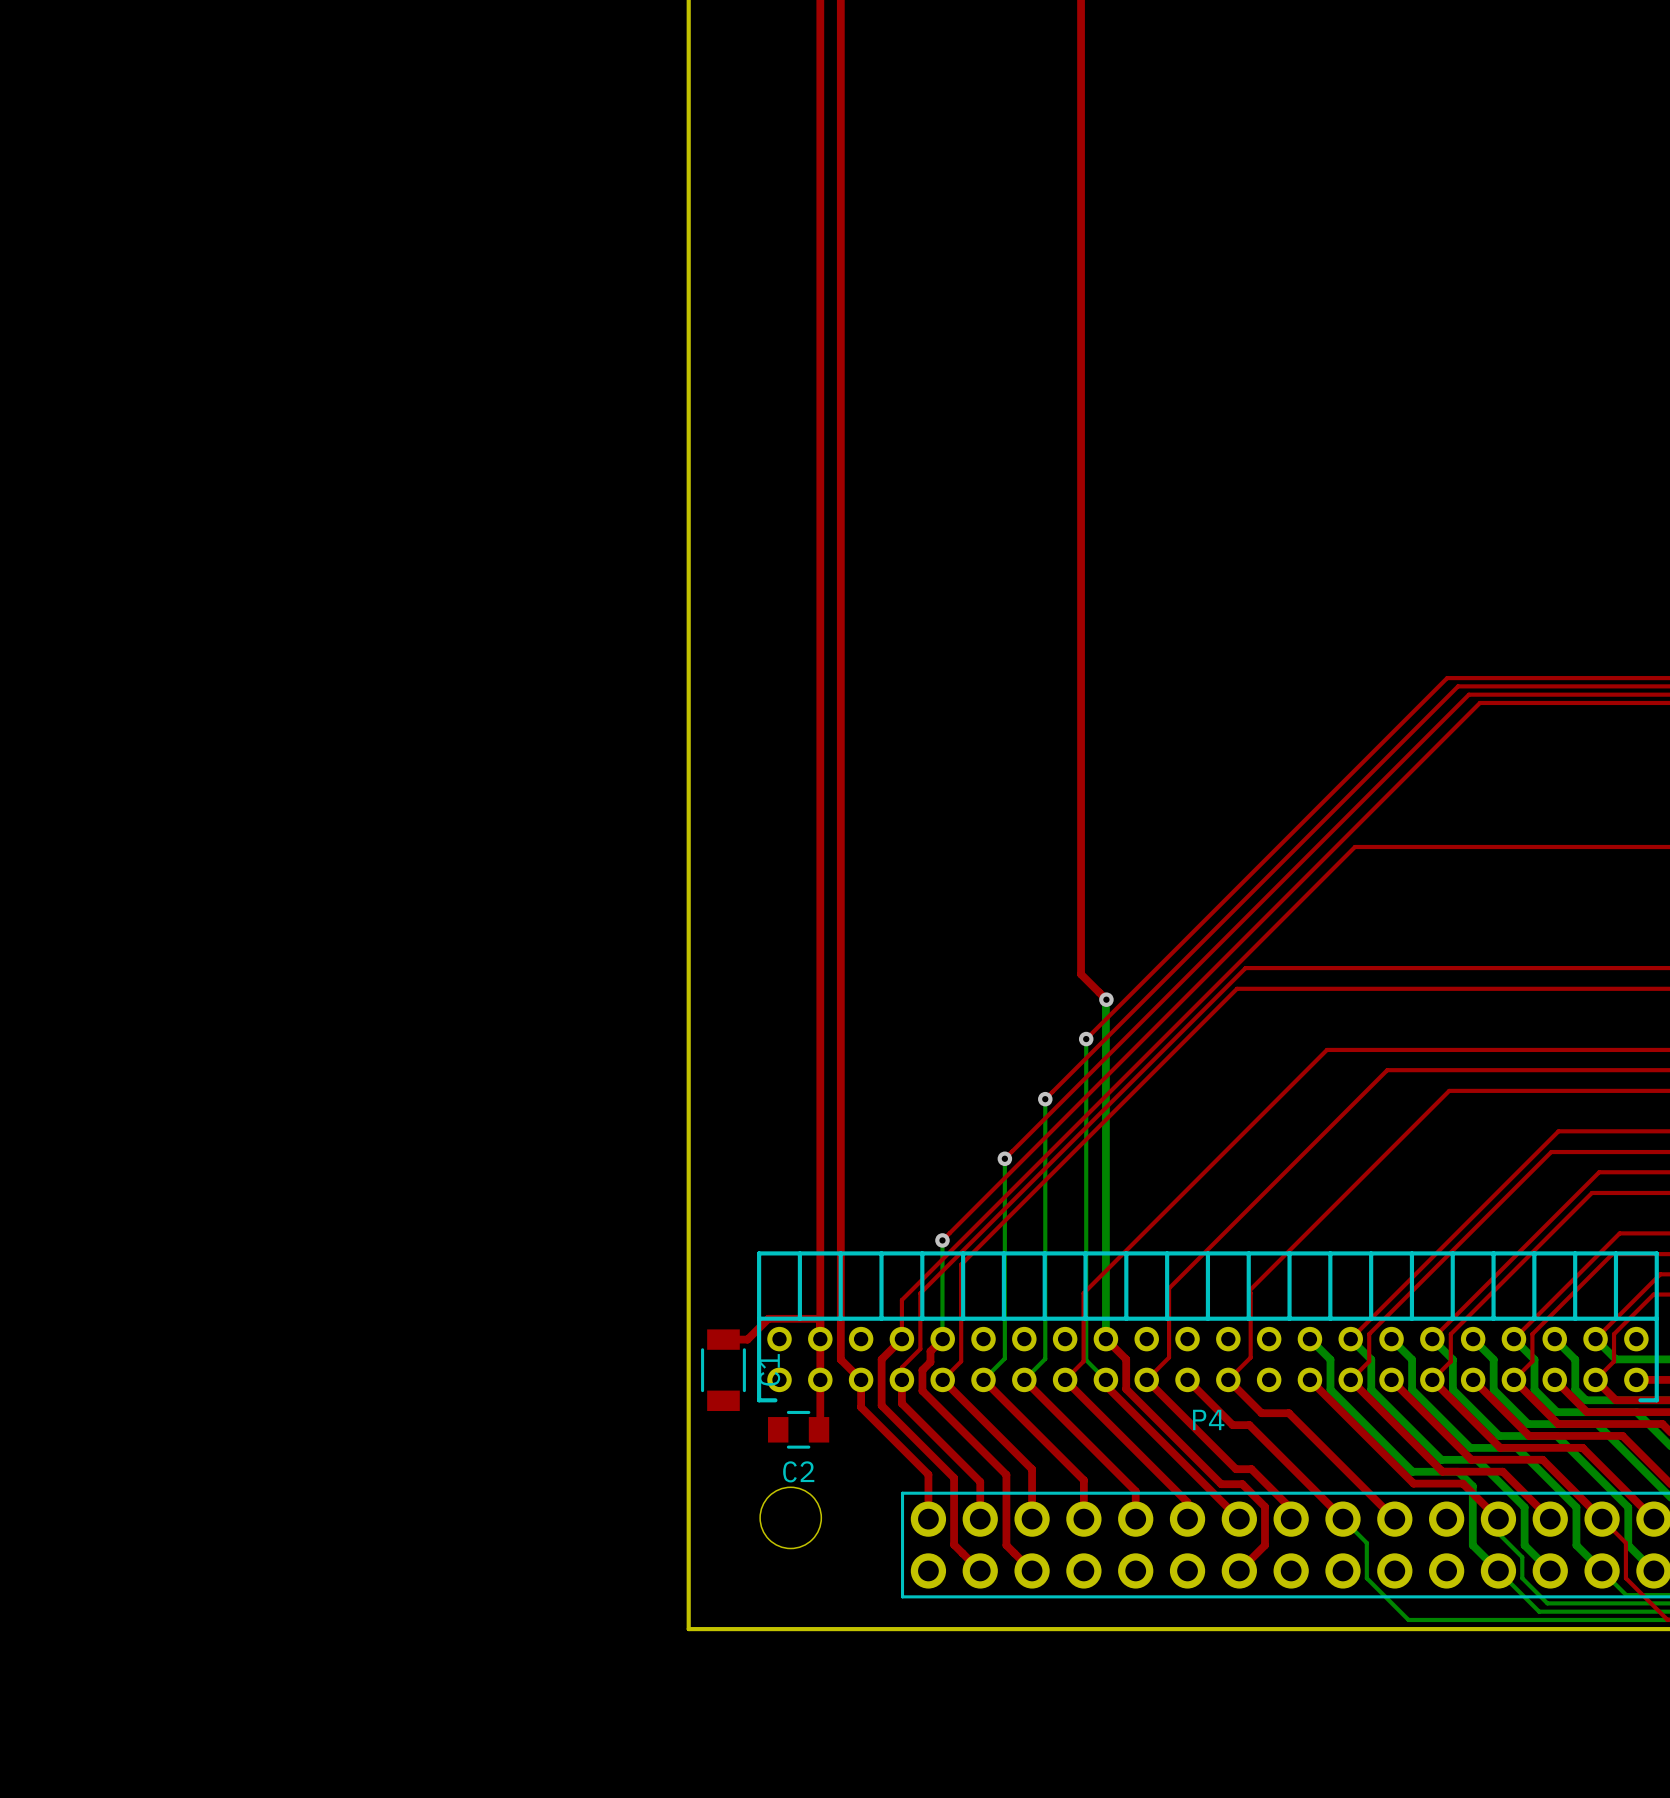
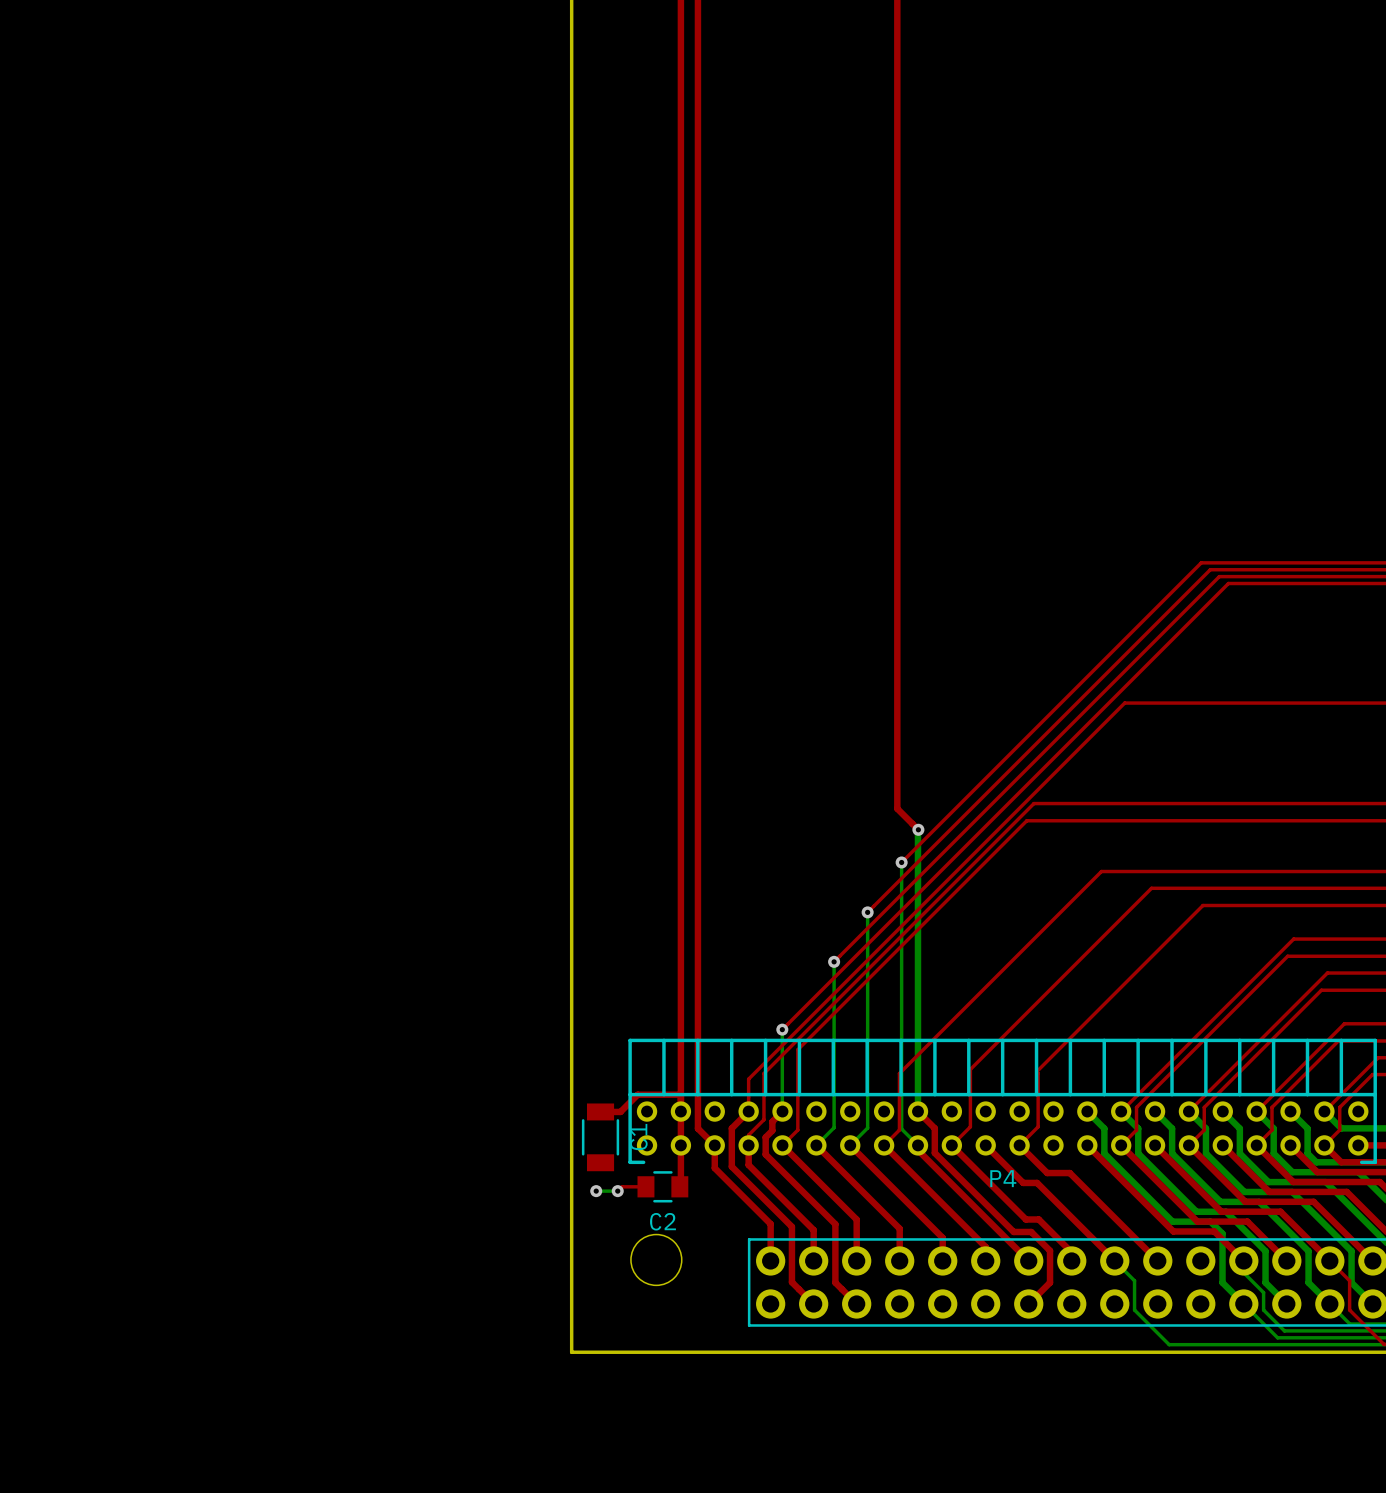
top track: none -> (645, 1186) (622, 1186) (617, 1191)
bottom track: none -> (596, 1191) (617, 1191)
via: none -> (596, 1191)
via: none -> (617, 1191)

